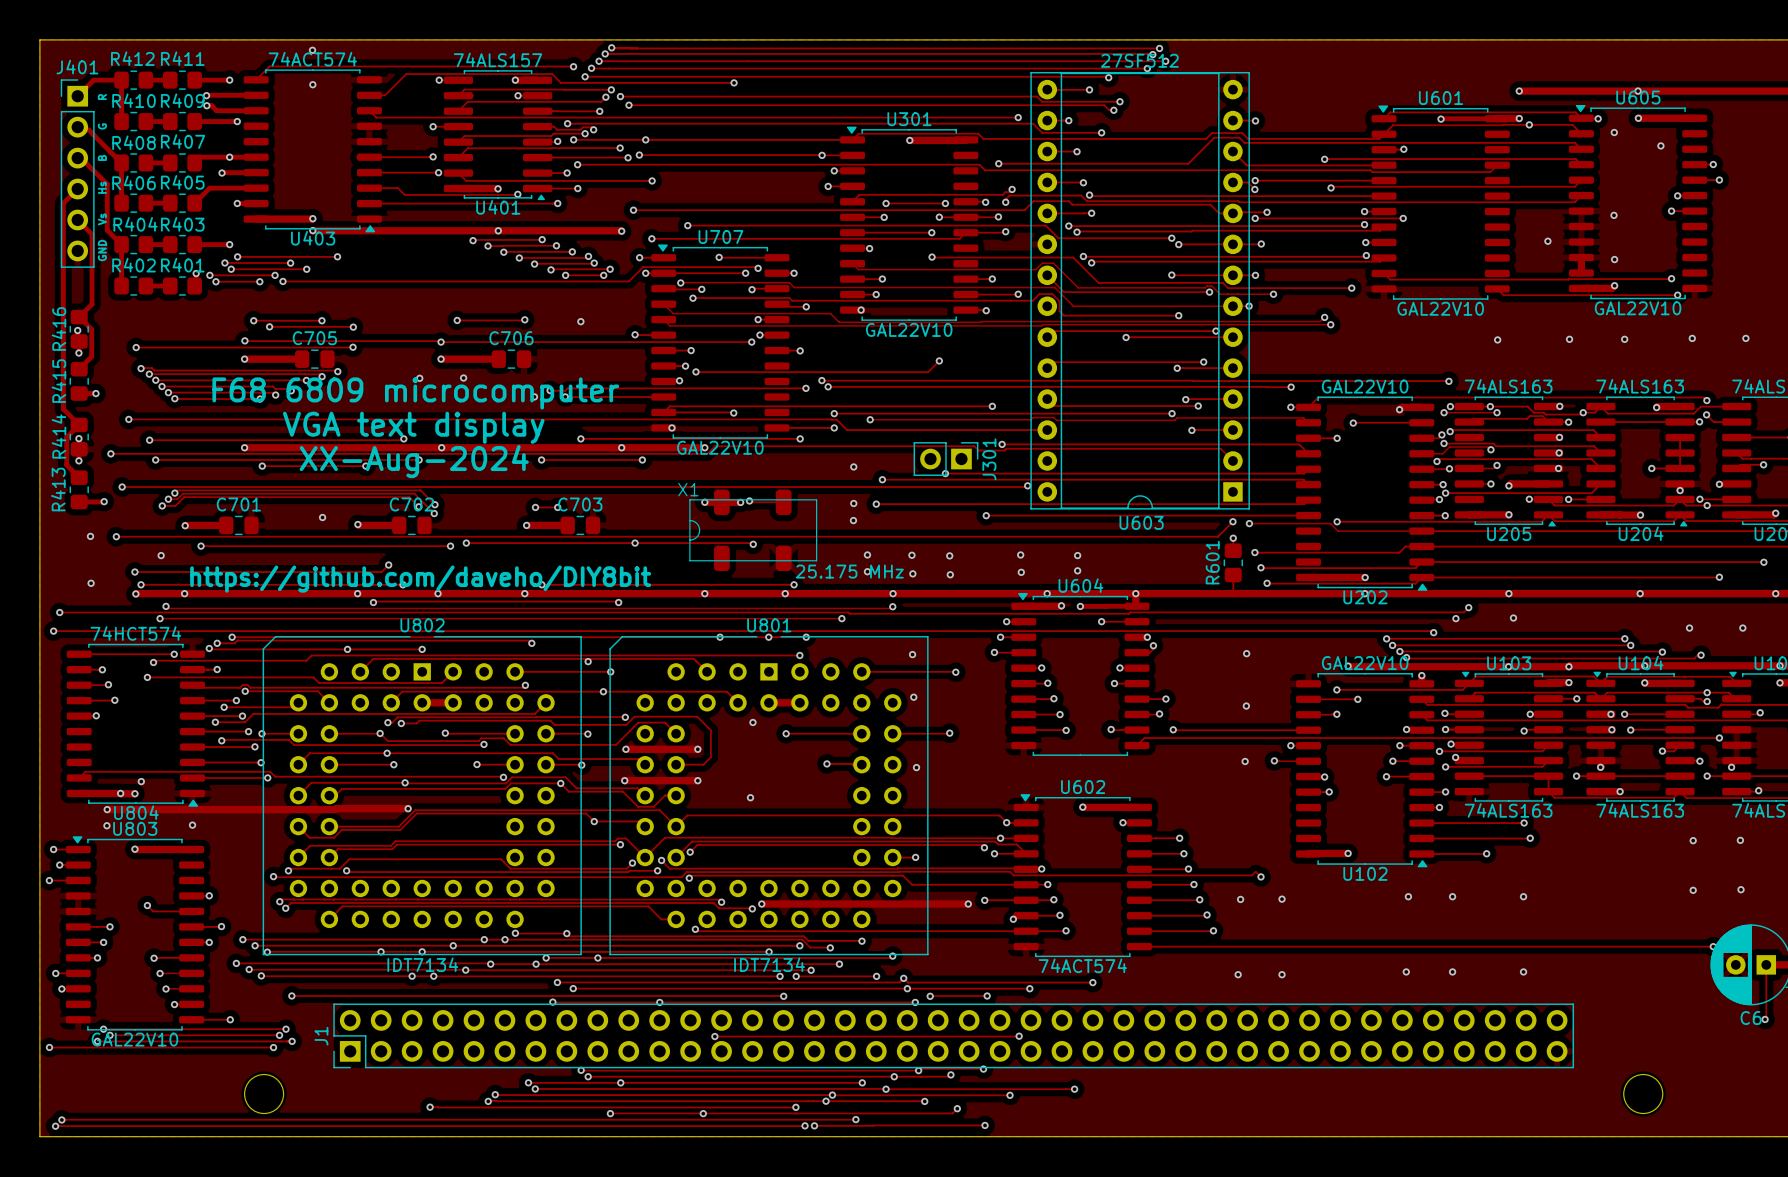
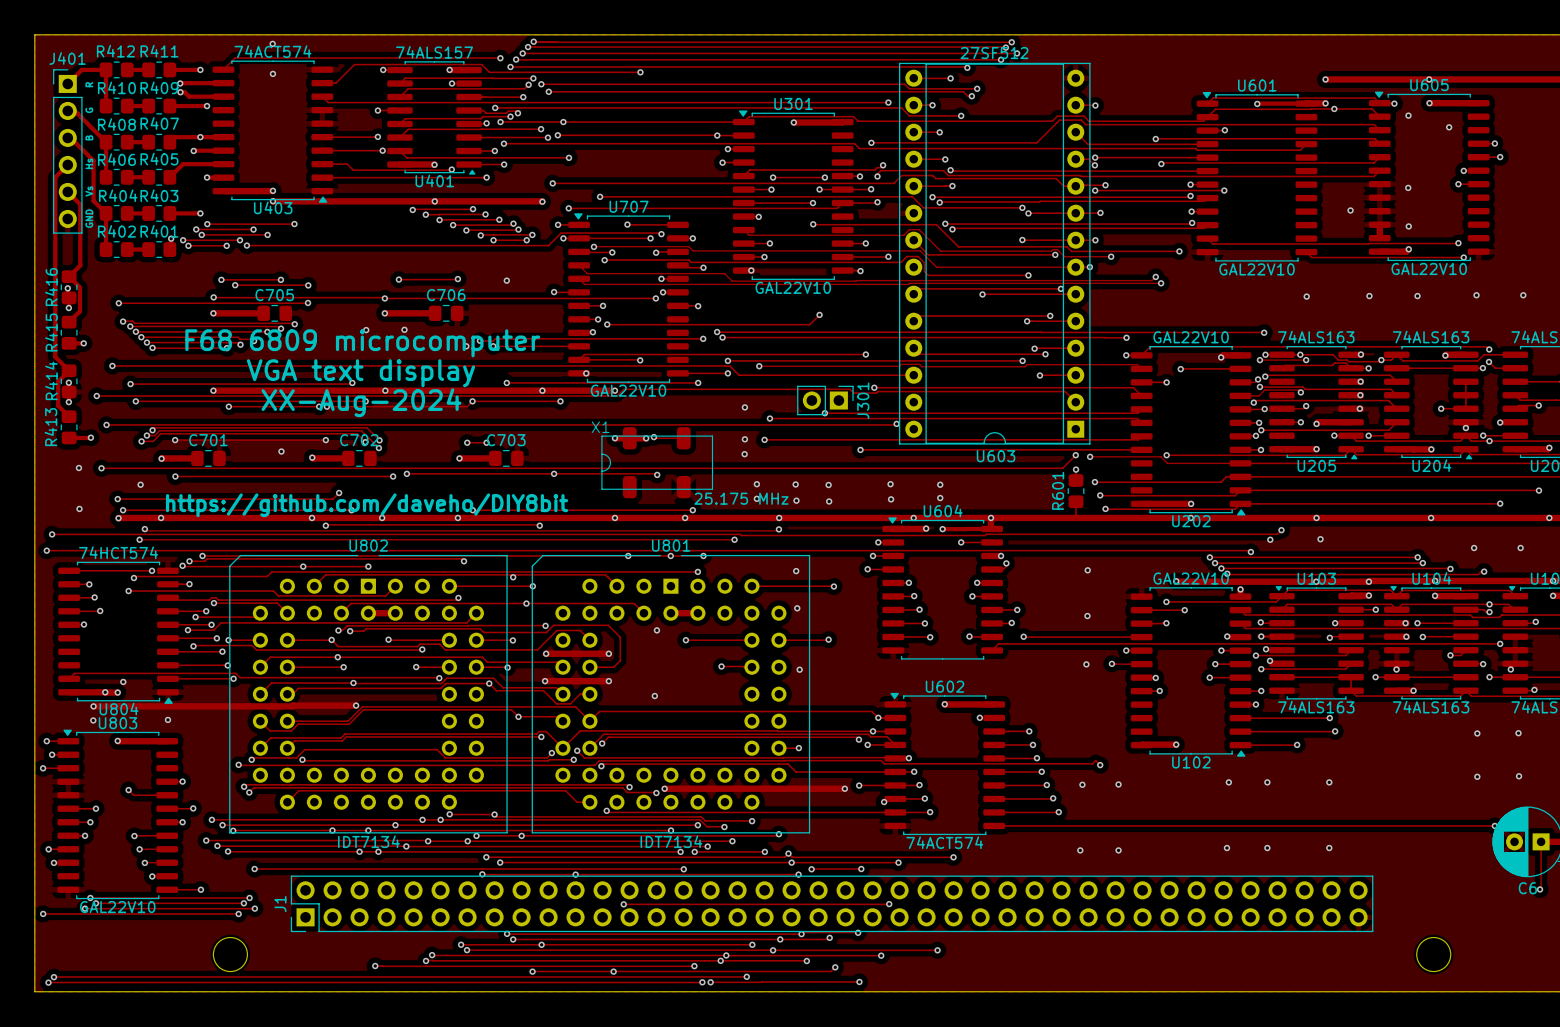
track: none -> (472, 401) (467, 406) (326, 406)
via: none -> (326, 406)
track: none -> (175, 440) (325, 440)
via: none -> (175, 440)
via: none -> (325, 440)

